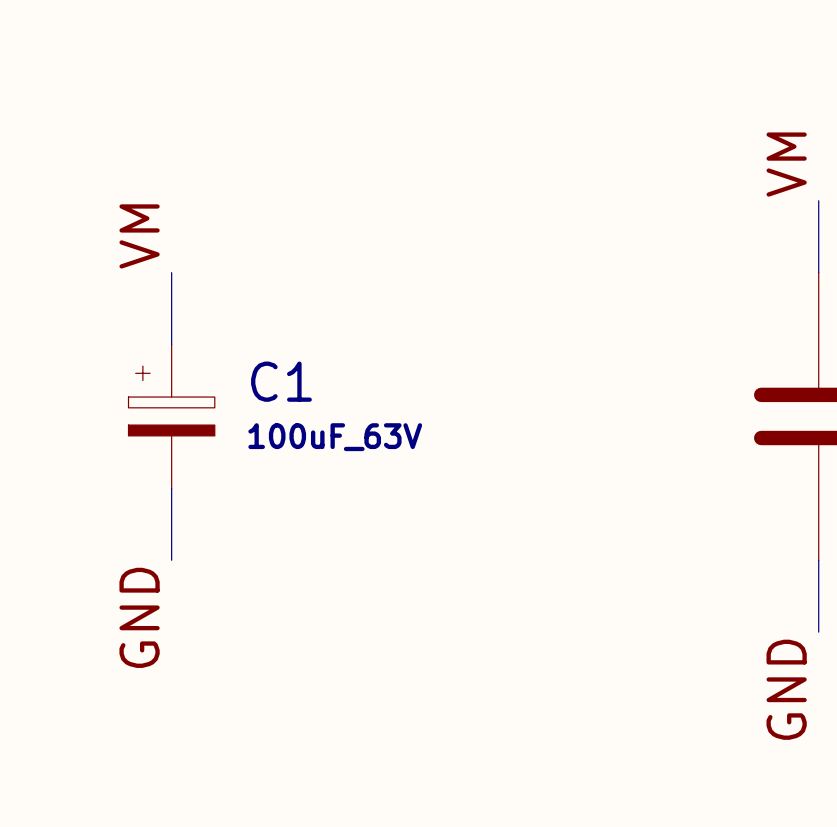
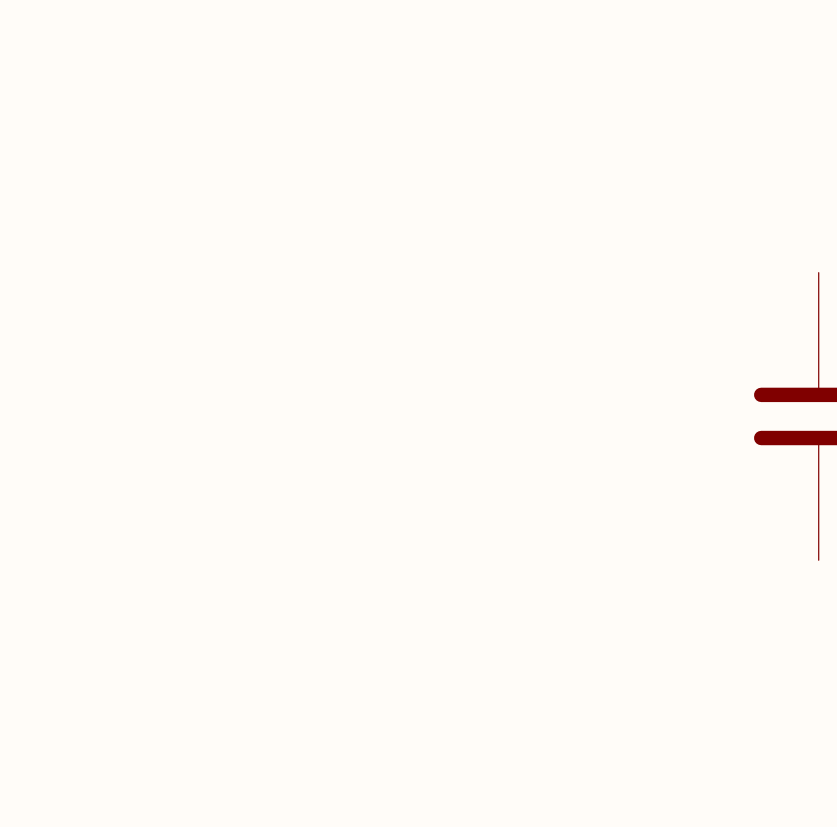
label: VM (786, 164) -> none
wire: (818, 200) (818, 272) -> none
label: VM (139, 236) -> none
wire: (171, 272) (171, 344) -> none
C1: 100uF_63V (171, 416) -> none
wire: (171, 488) (171, 560) -> none
wire: (818, 560) (818, 632) -> none
label: GND (139, 617) -> none
label: GND (786, 689) -> none

